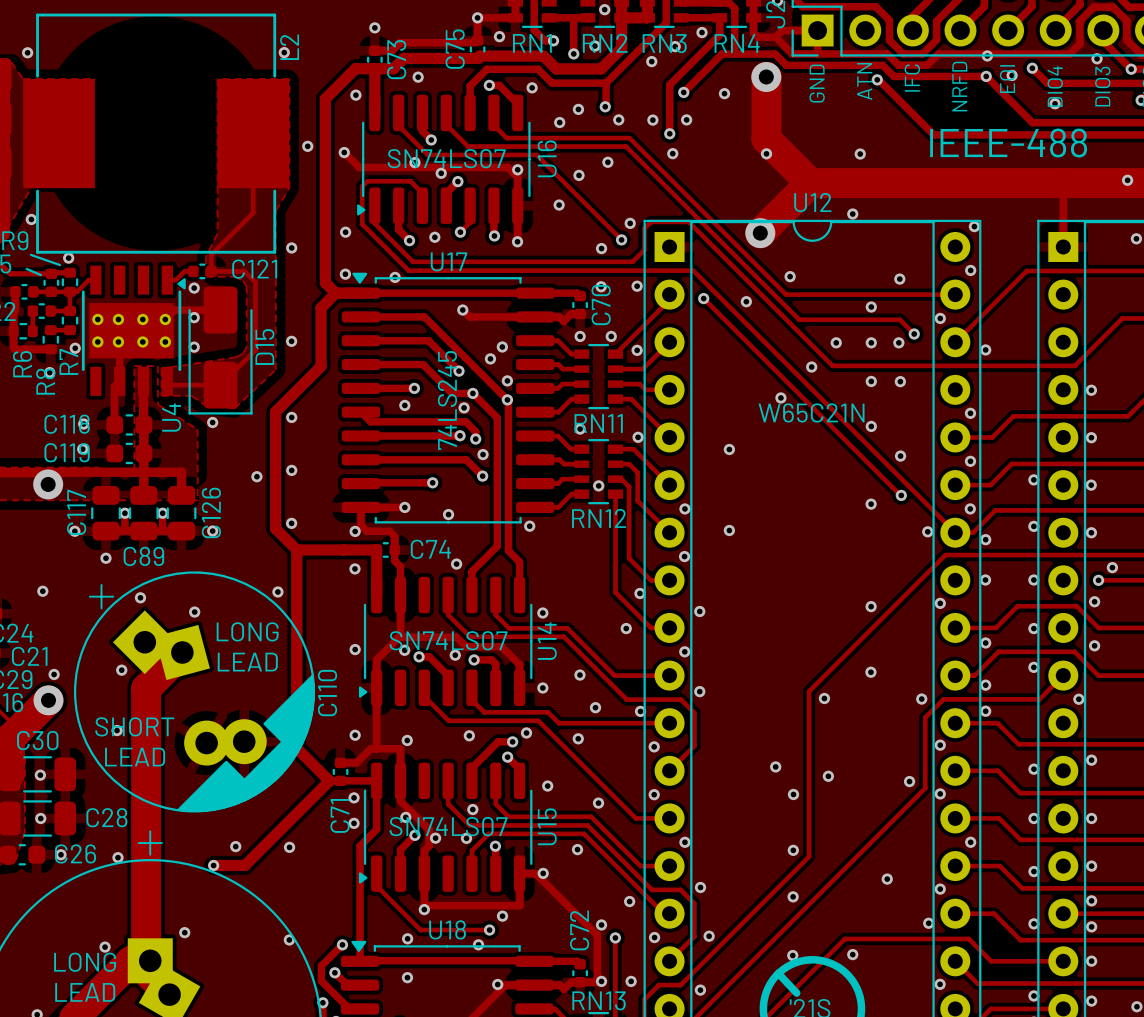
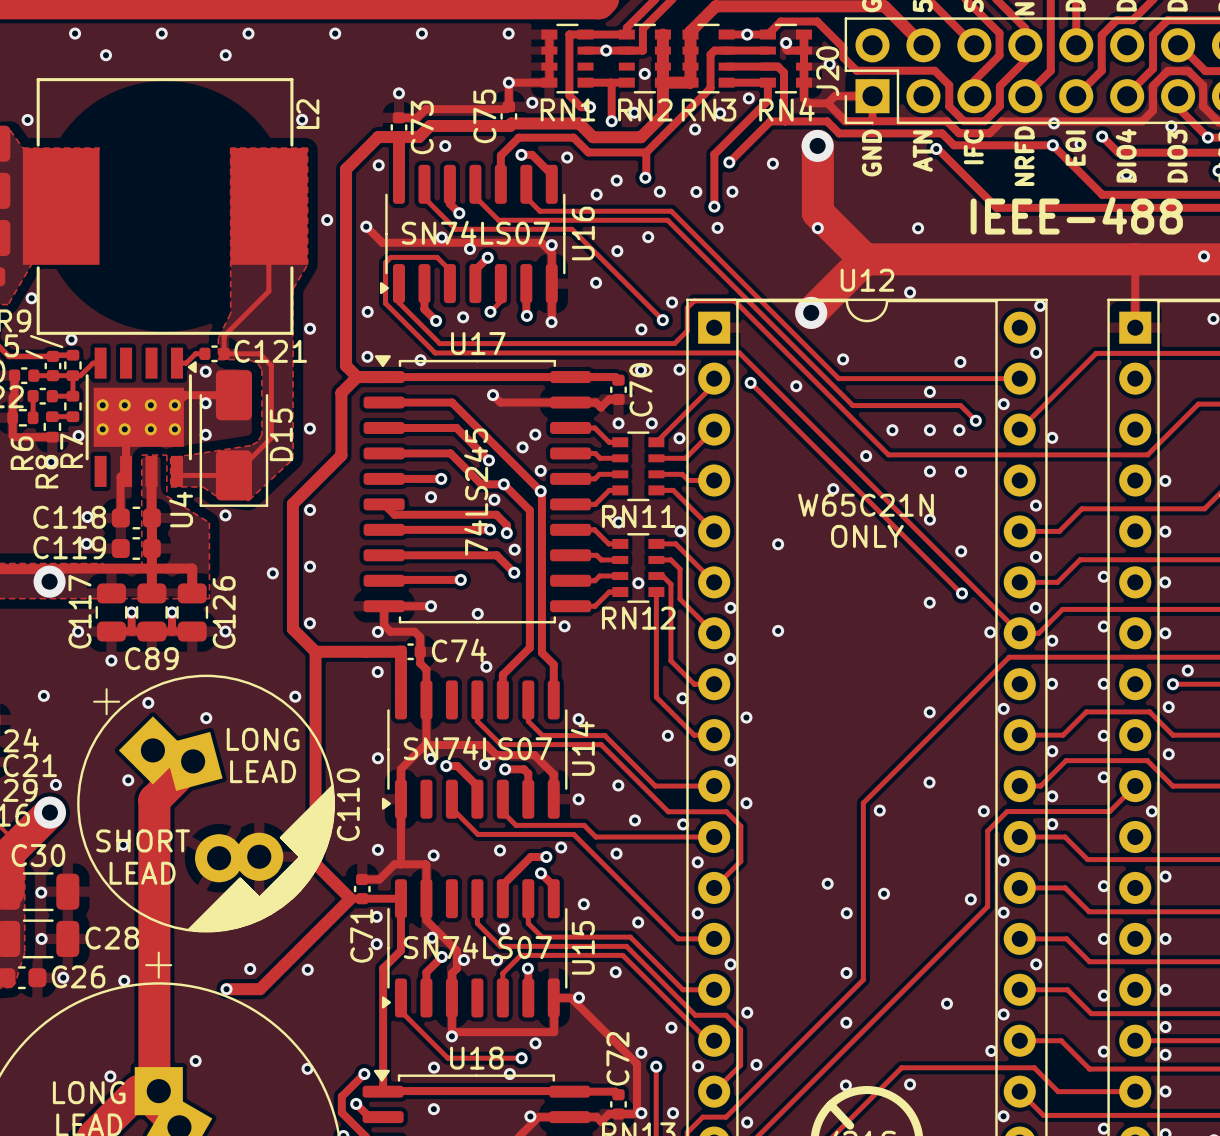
text: none -> ONLY (867, 536)

